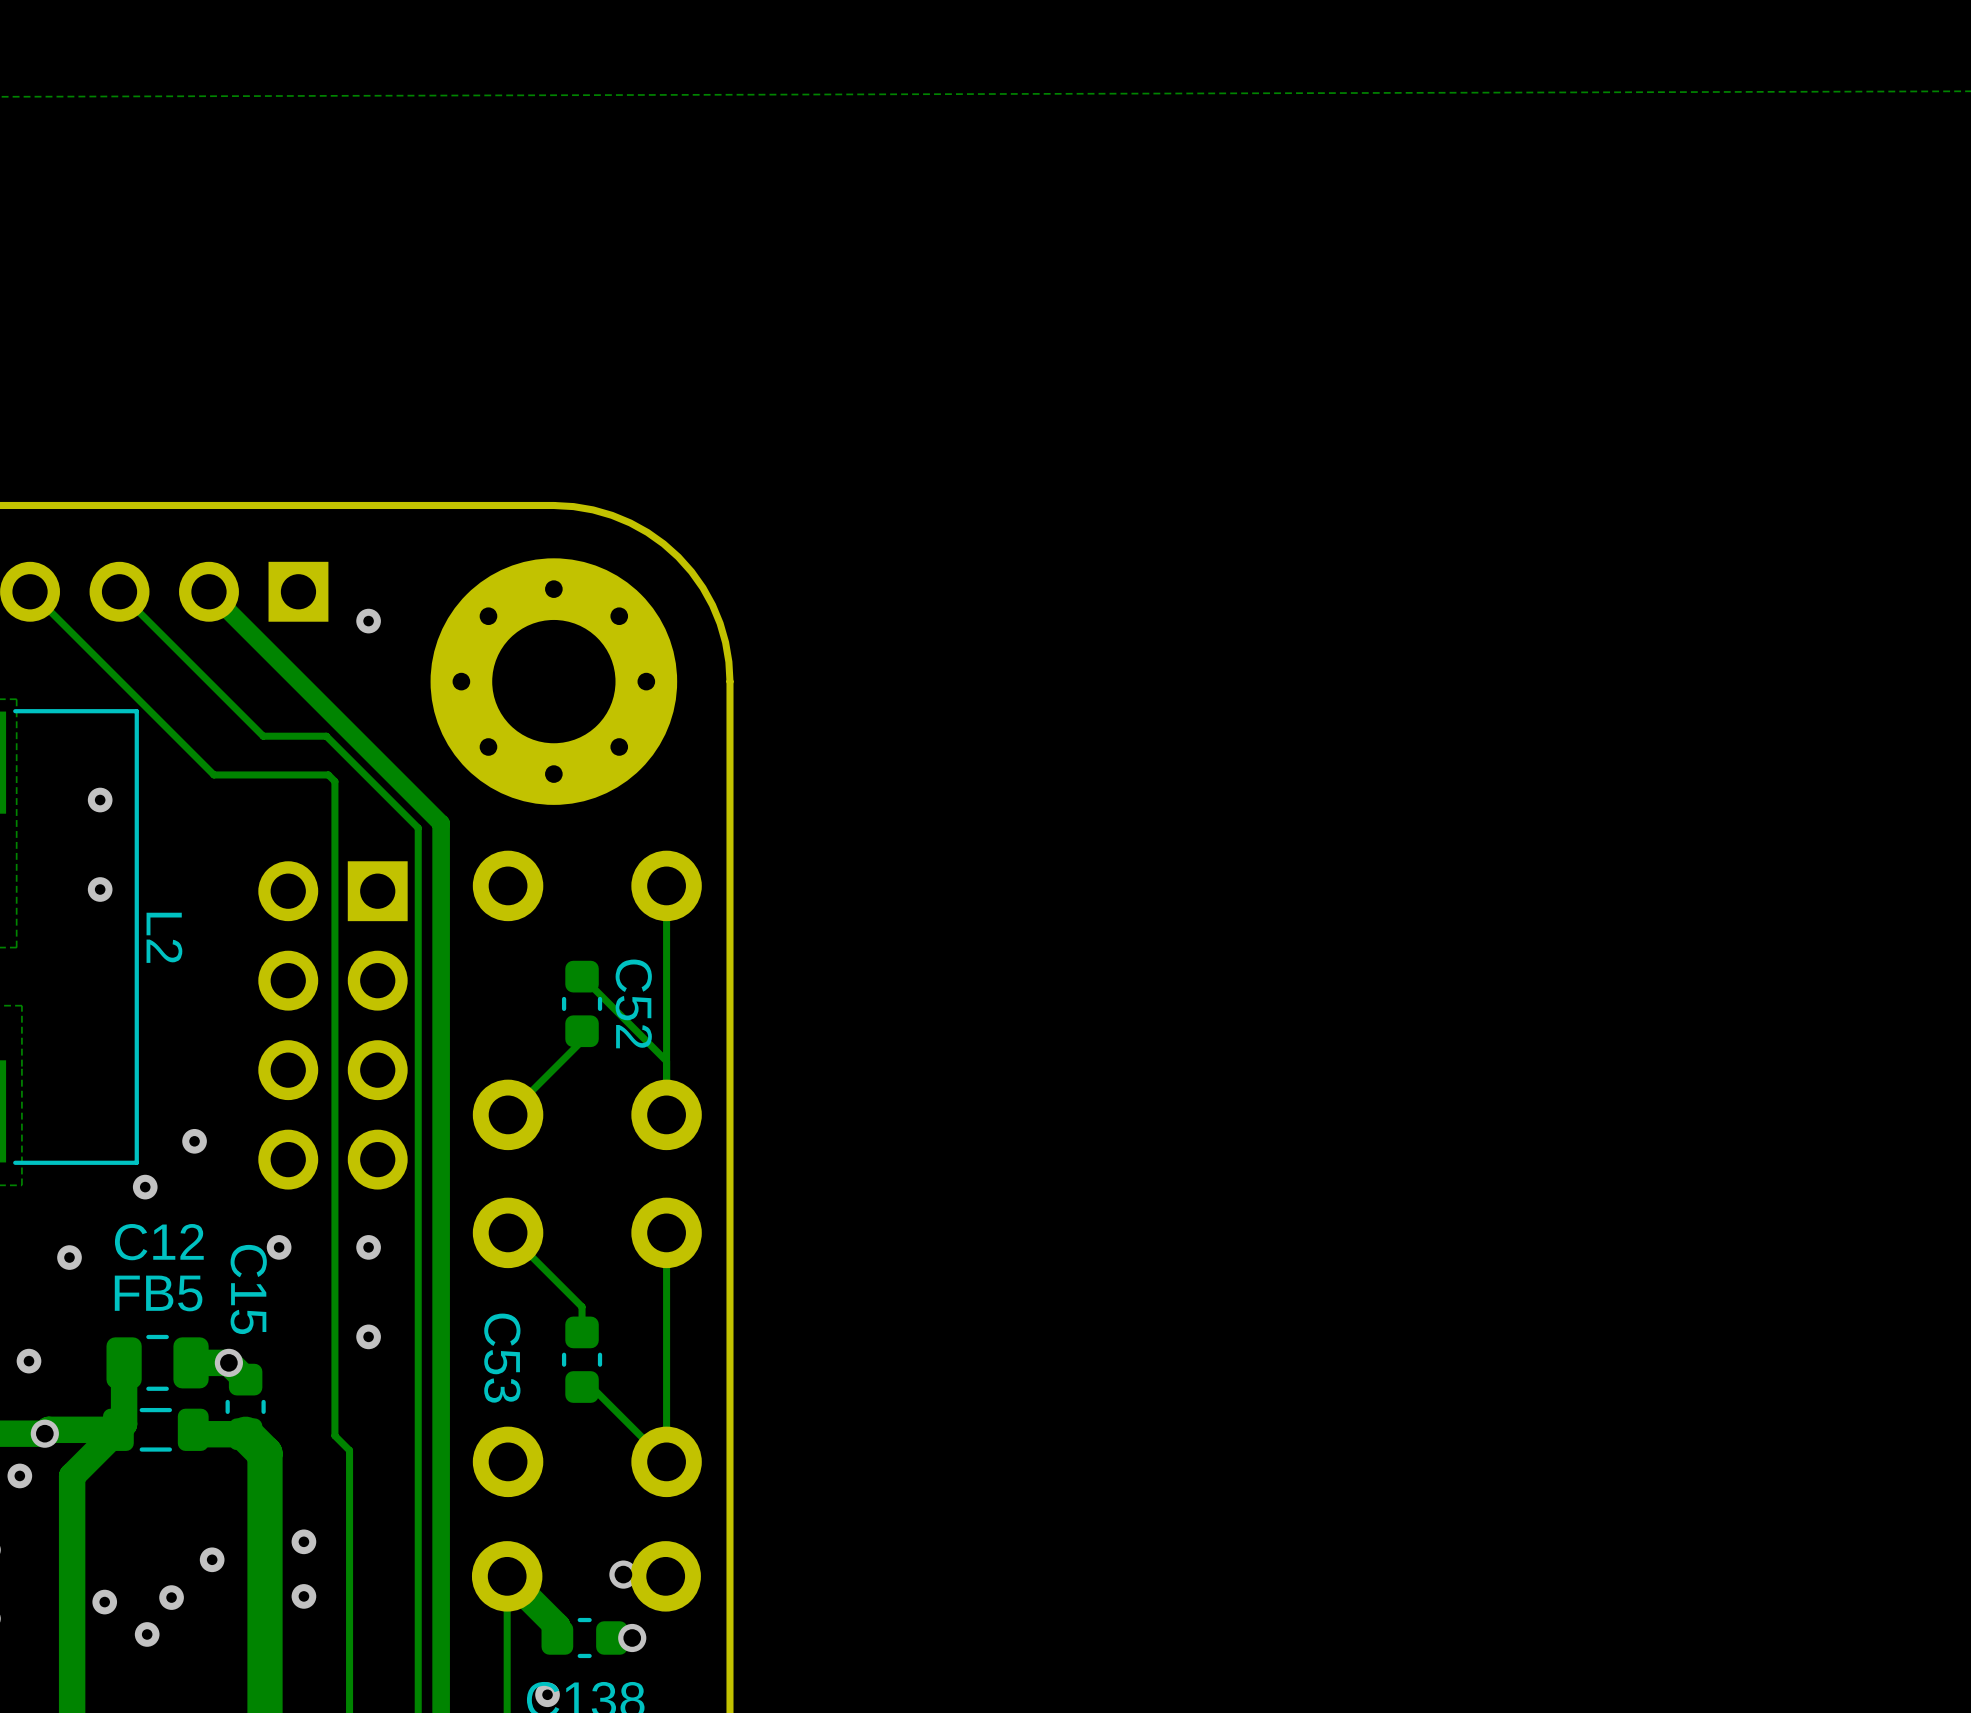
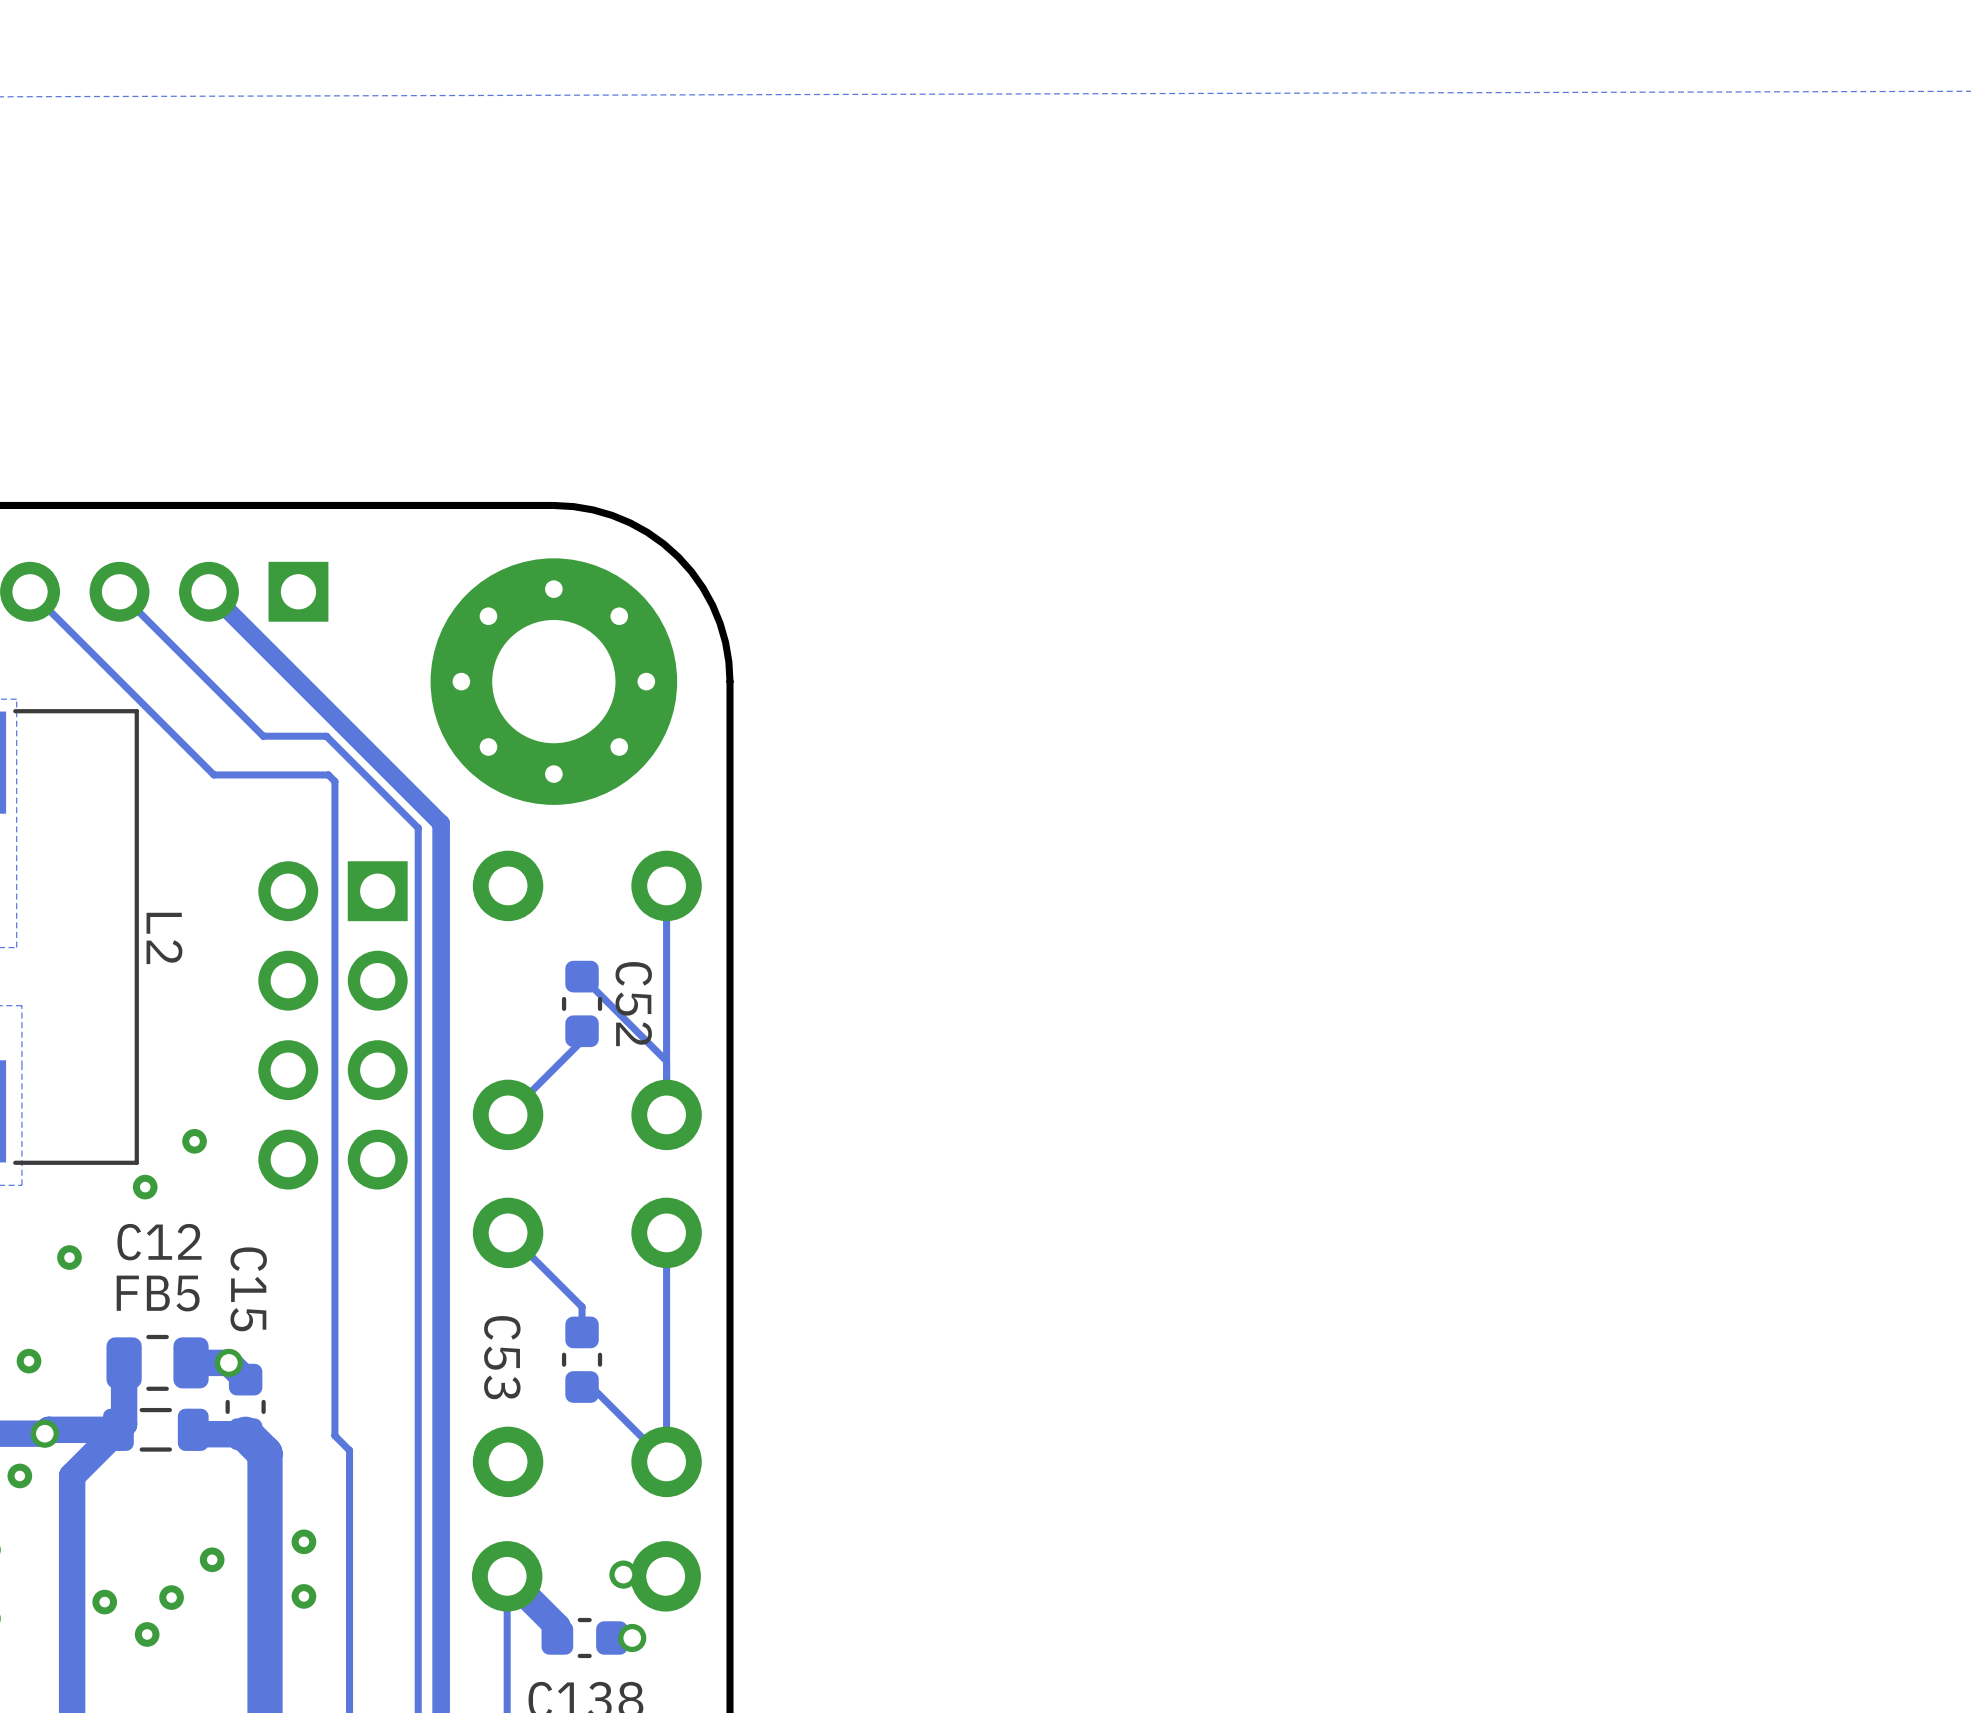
via: (368, 621) -> none
via: (100, 800) -> none
via: (100, 889) -> none
via: (279, 1247) -> none
via: (368, 1247) -> none
via: (368, 1336) -> none
via: (547, 1694) -> none

